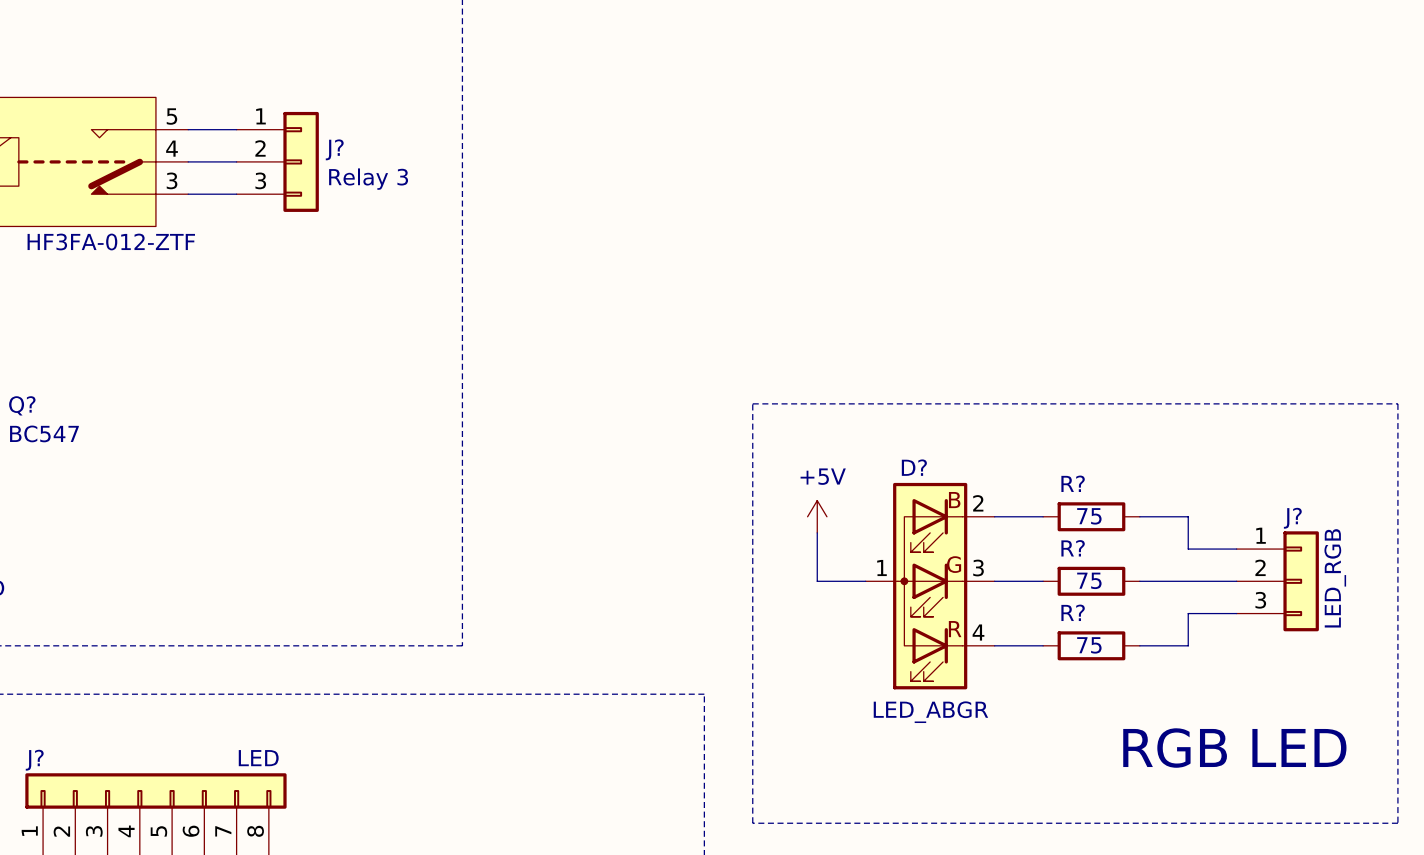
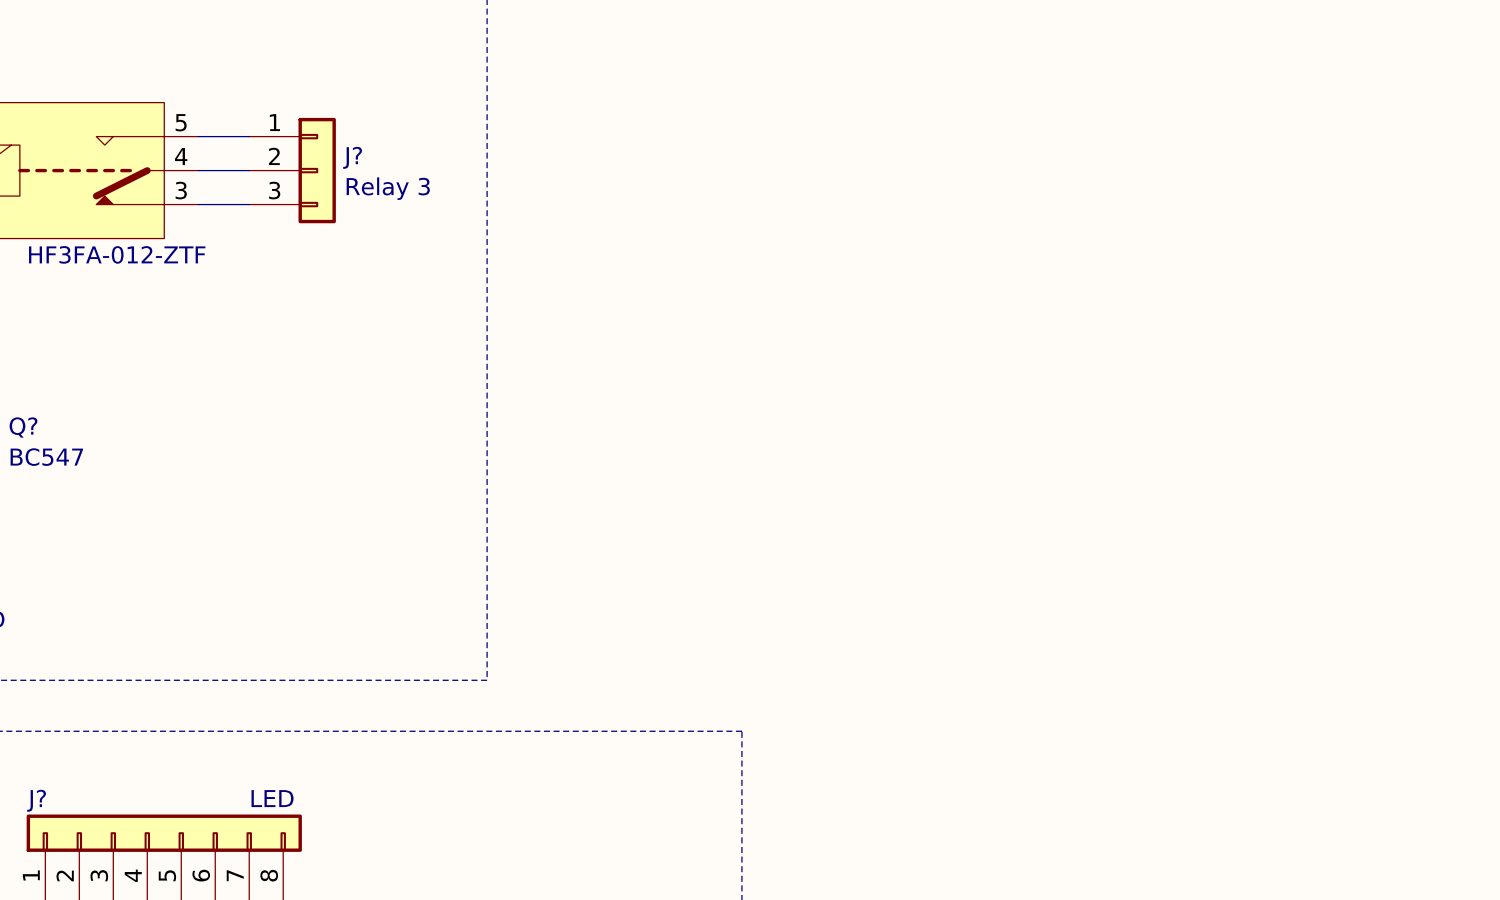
line: (752, 403) (1397, 403) (1397, 823) (752, 823) (752, 403) -> none
power symbol: +5V (817, 516) -> none
wire: (994, 516) (1043, 516) -> none
R?: 75 (1091, 516) -> none
wire: (1139, 516) (1188, 516) (1188, 549) (1236, 549) -> none
wire: (817, 532) (817, 581) (865, 581) -> none
wire: (994, 581) (1043, 581) -> none
R?: 75 (1091, 581) -> none
wire: (1139, 581) (1236, 581) -> none
J?: LED_RGB (1277, 581) -> none
D?: LED_ABGR (930, 586) -> none
wire: (1236, 613) (1188, 613) (1188, 645) (1139, 645) -> none
wire: (994, 645) (1043, 645) -> none
R?: 75 (1091, 645) -> none
text: RGB LED (1234, 748) -> none

